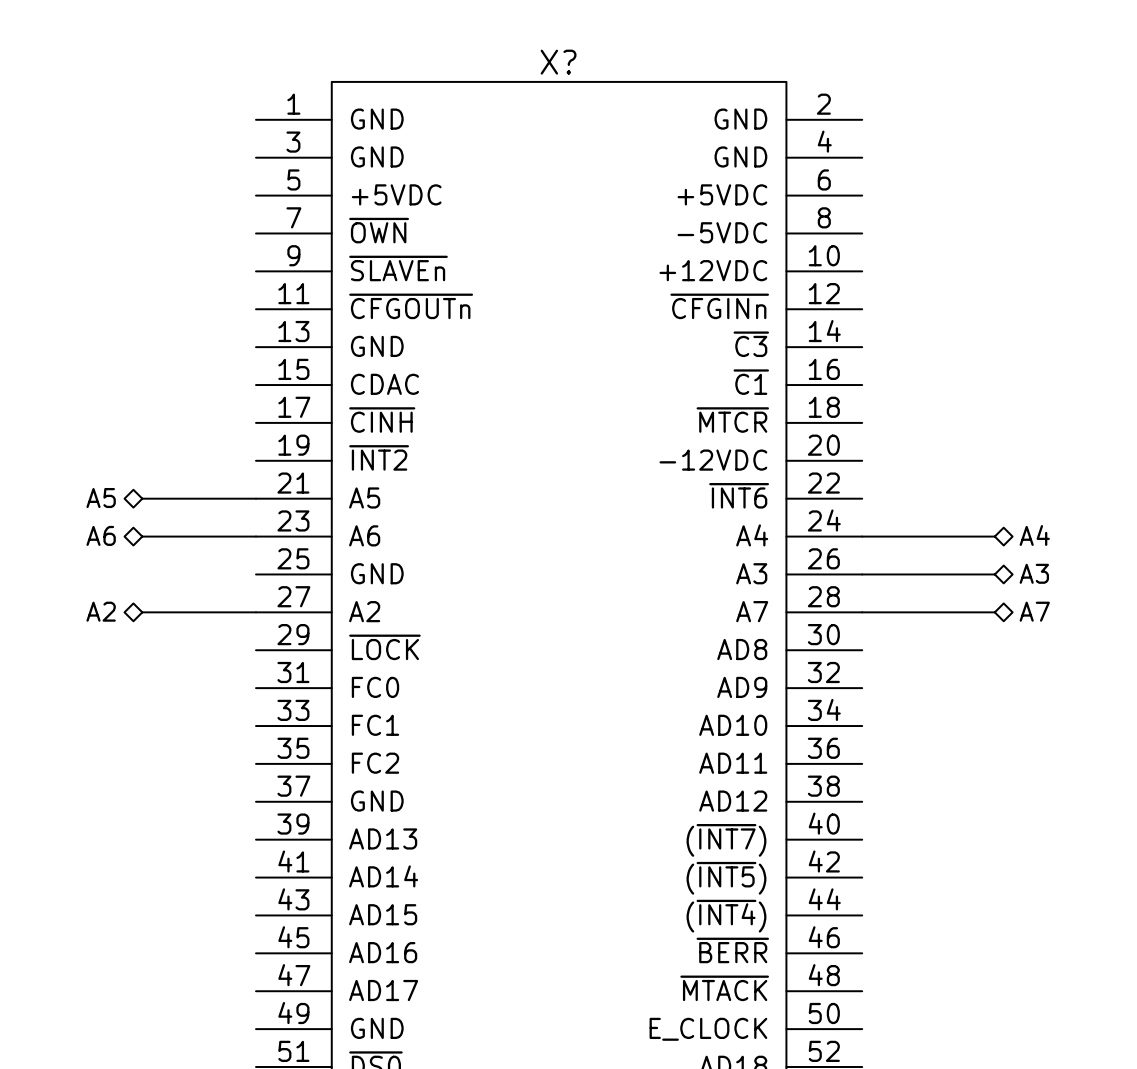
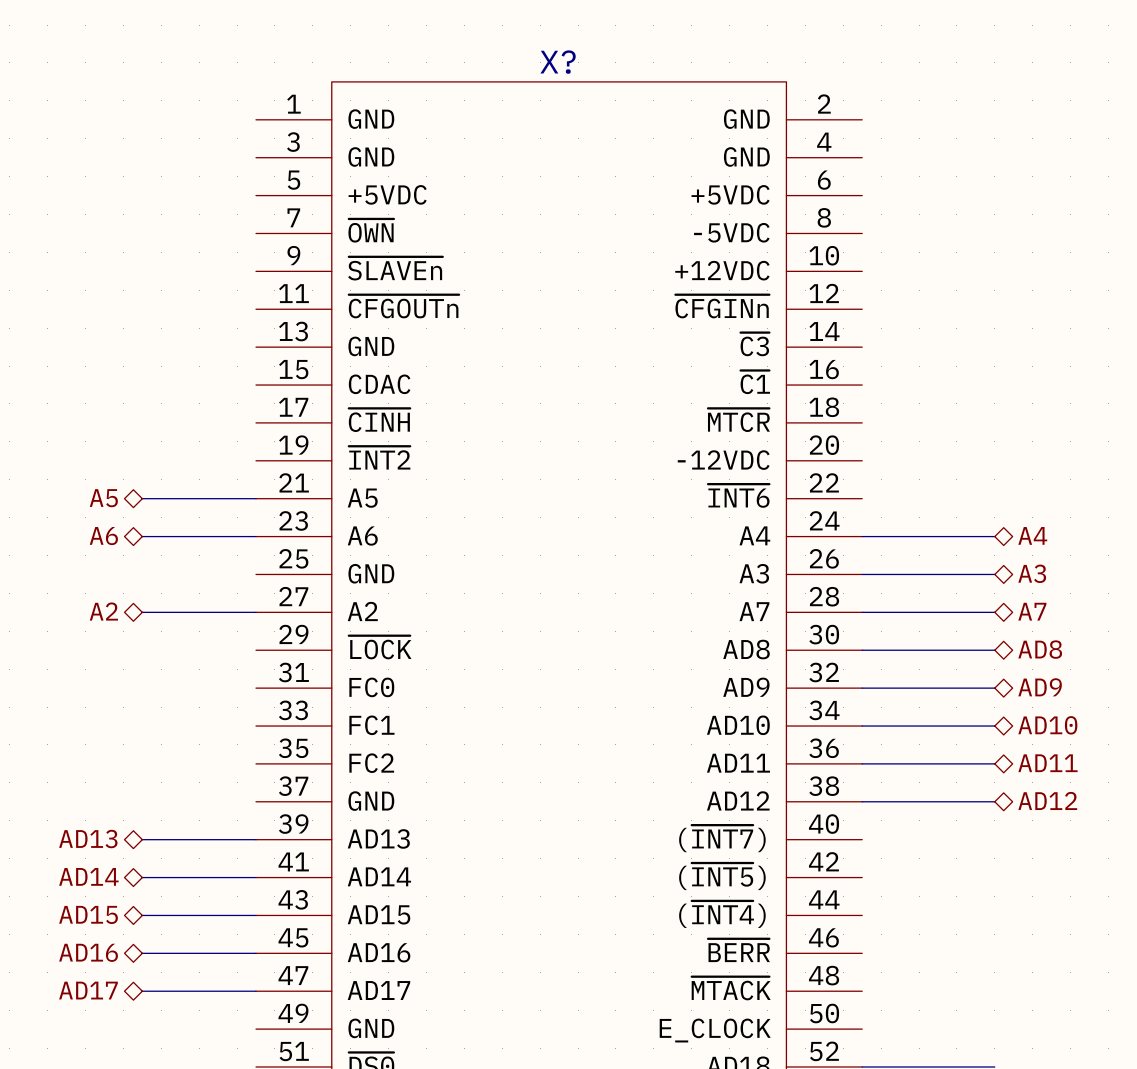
hierarchical label: none -> AD8 (1040, 649)
wire: none -> (862, 650) (994, 650)
hierarchical label: none -> AD9 (1040, 687)
wire: none -> (862, 688) (994, 688)
hierarchical label: none -> AD10 (1047, 725)
wire: none -> (862, 726) (994, 726)
wire: none -> (862, 763) (994, 763)
hierarchical label: none -> AD11 (1047, 763)
wire: none -> (862, 801) (994, 801)
hierarchical label: none -> AD12 (1047, 800)
hierarchical label: none -> AD13 (88, 839)
wire: none -> (142, 839) (256, 839)
hierarchical label: none -> AD14 (88, 876)
wire: none -> (142, 877) (256, 877)
hierarchical label: none -> AD15 (88, 914)
wire: none -> (142, 915) (256, 915)
hierarchical label: none -> AD16 (88, 952)
wire: none -> (142, 953) (256, 953)
hierarchical label: none -> AD17 (88, 990)
wire: none -> (142, 991) (256, 991)
wire: none -> (862, 1067) (994, 1067)

